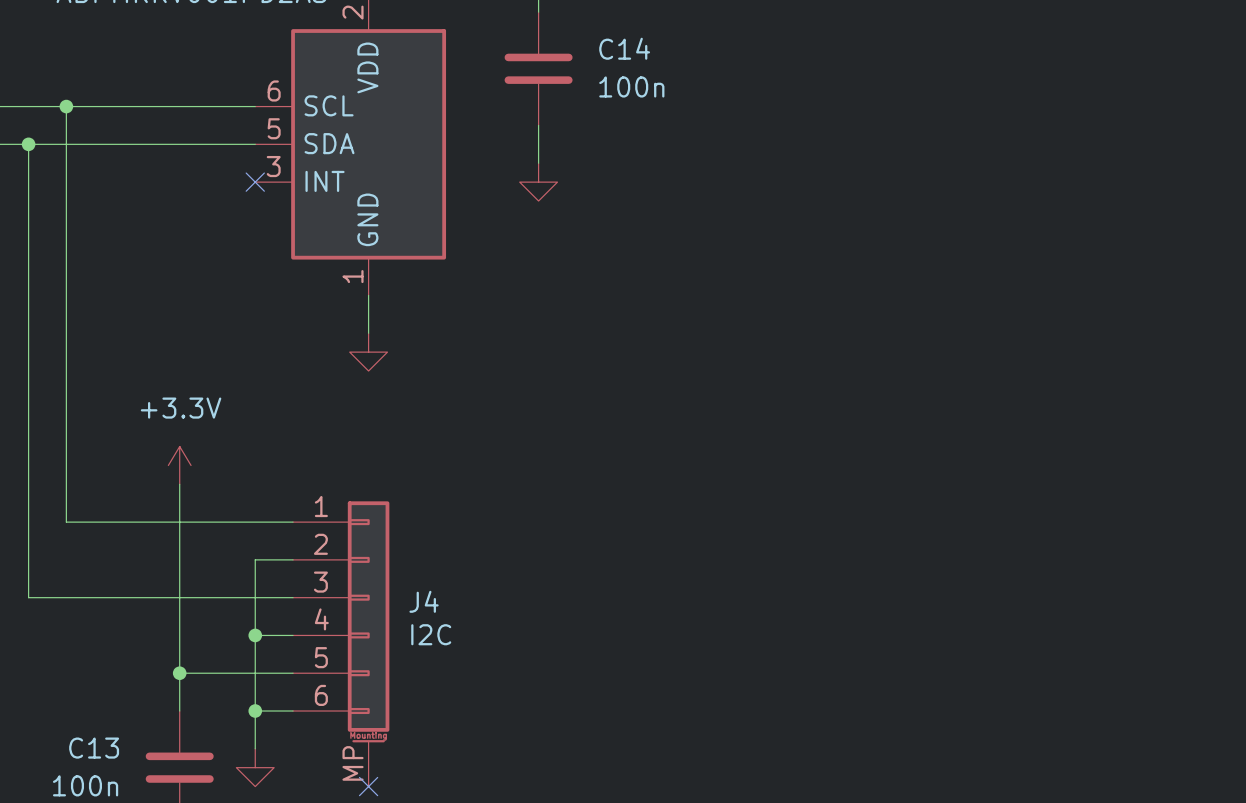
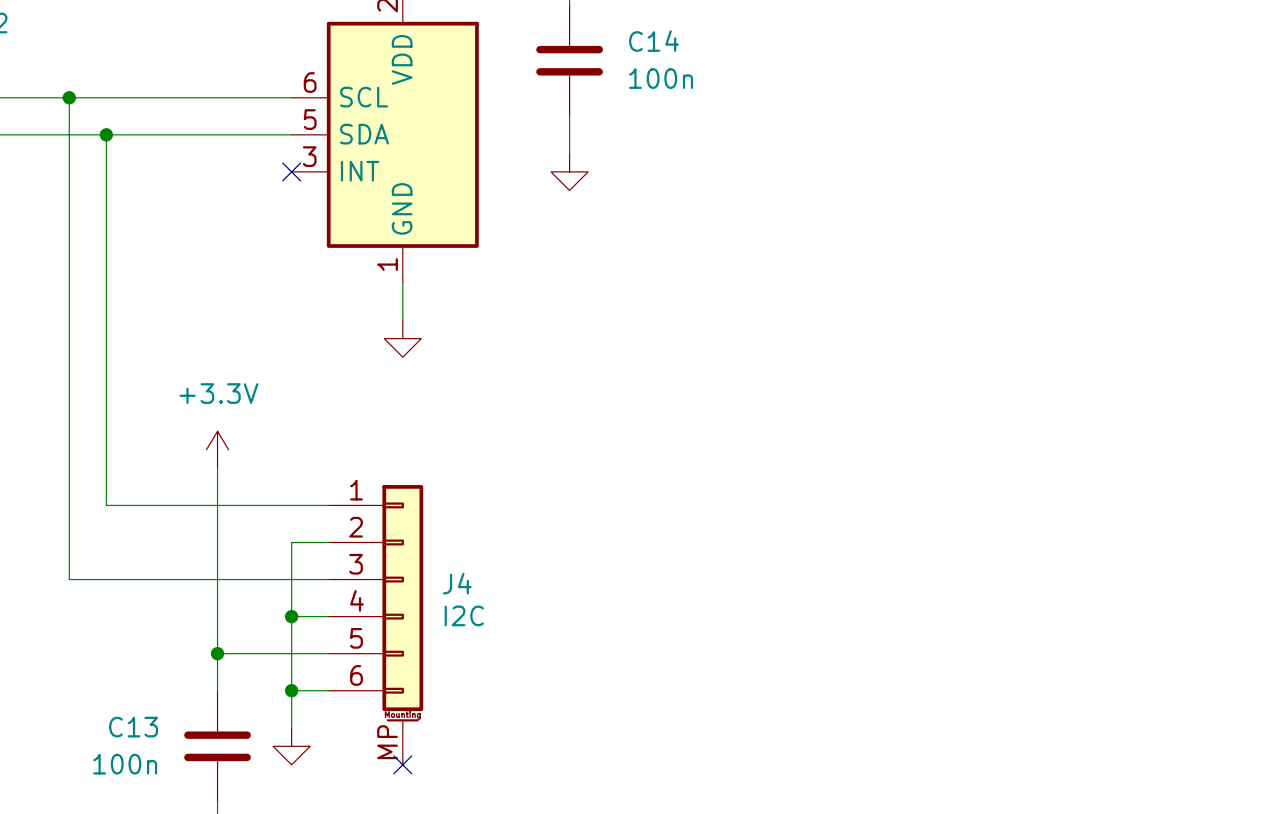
junction: none -> (69, 97)
wire: (66, 106) (66, 144) -> (69, 97) (69, 134)
junction: (66, 106) -> none
junction: (28, 144) -> none
junction: none -> (106, 134)

